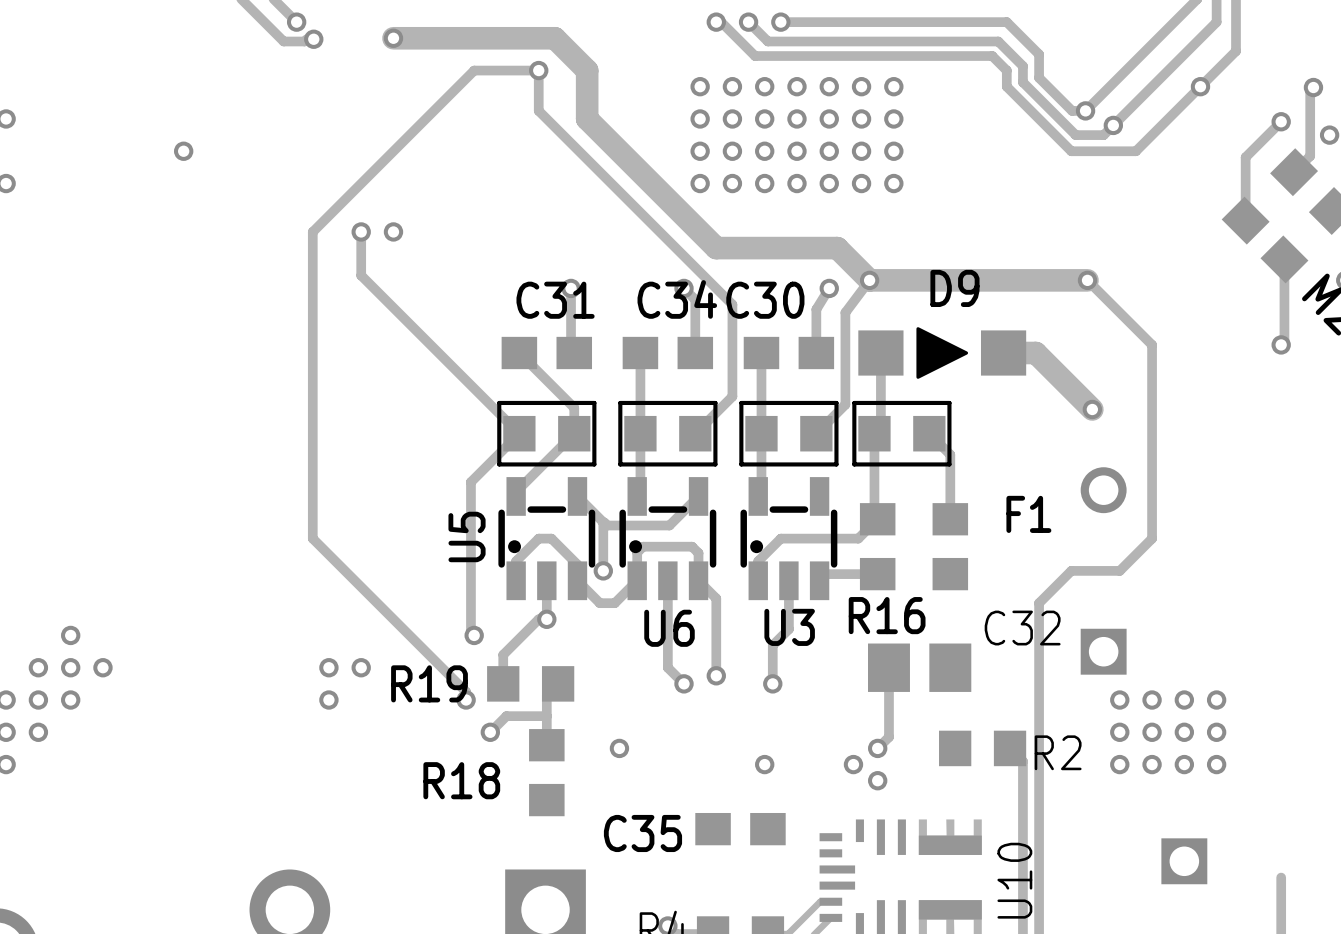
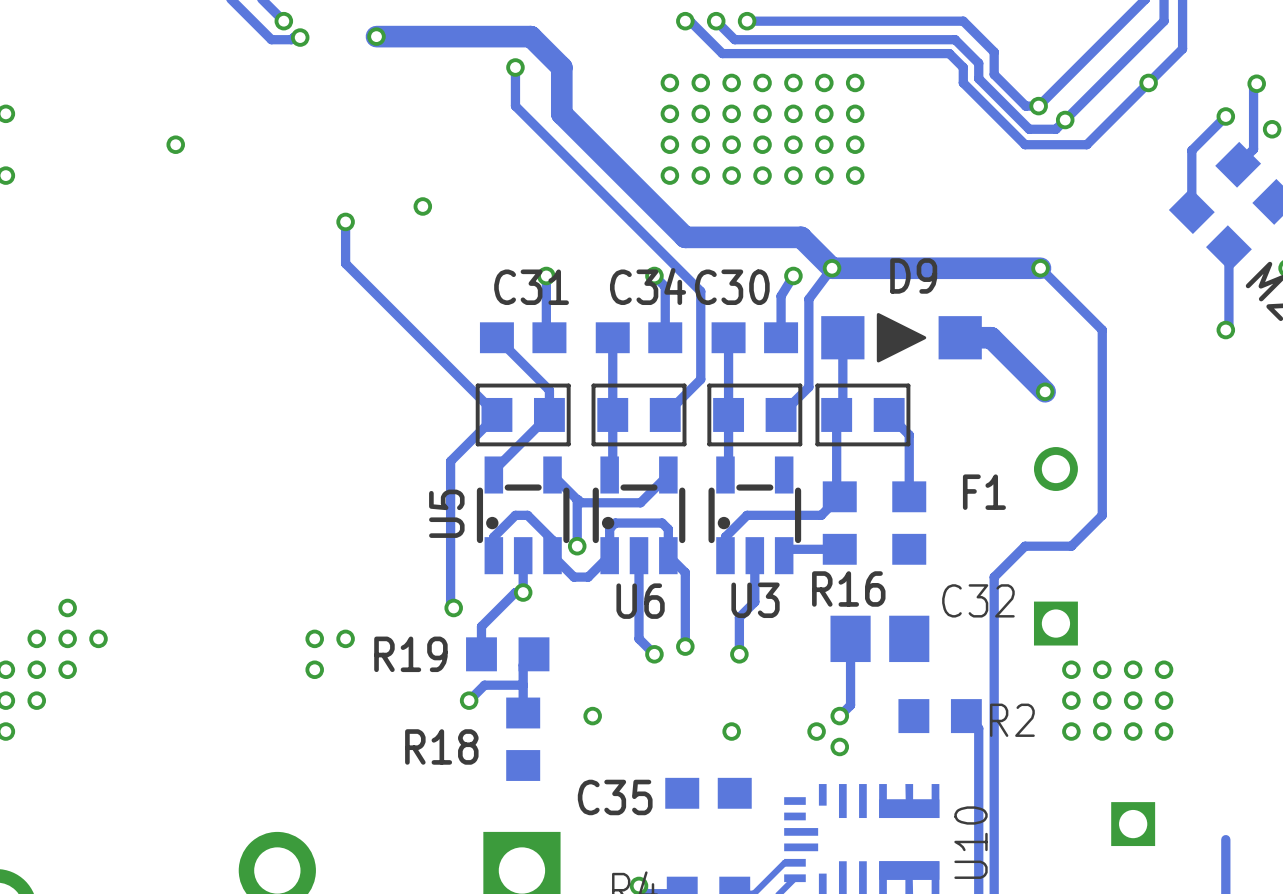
track: (538, 70) (474, 70) (312, 231) (312, 538) (466, 691) (466, 700) -> none
via position: (393, 231) -> (422, 206)
via: (466, 700) -> none

